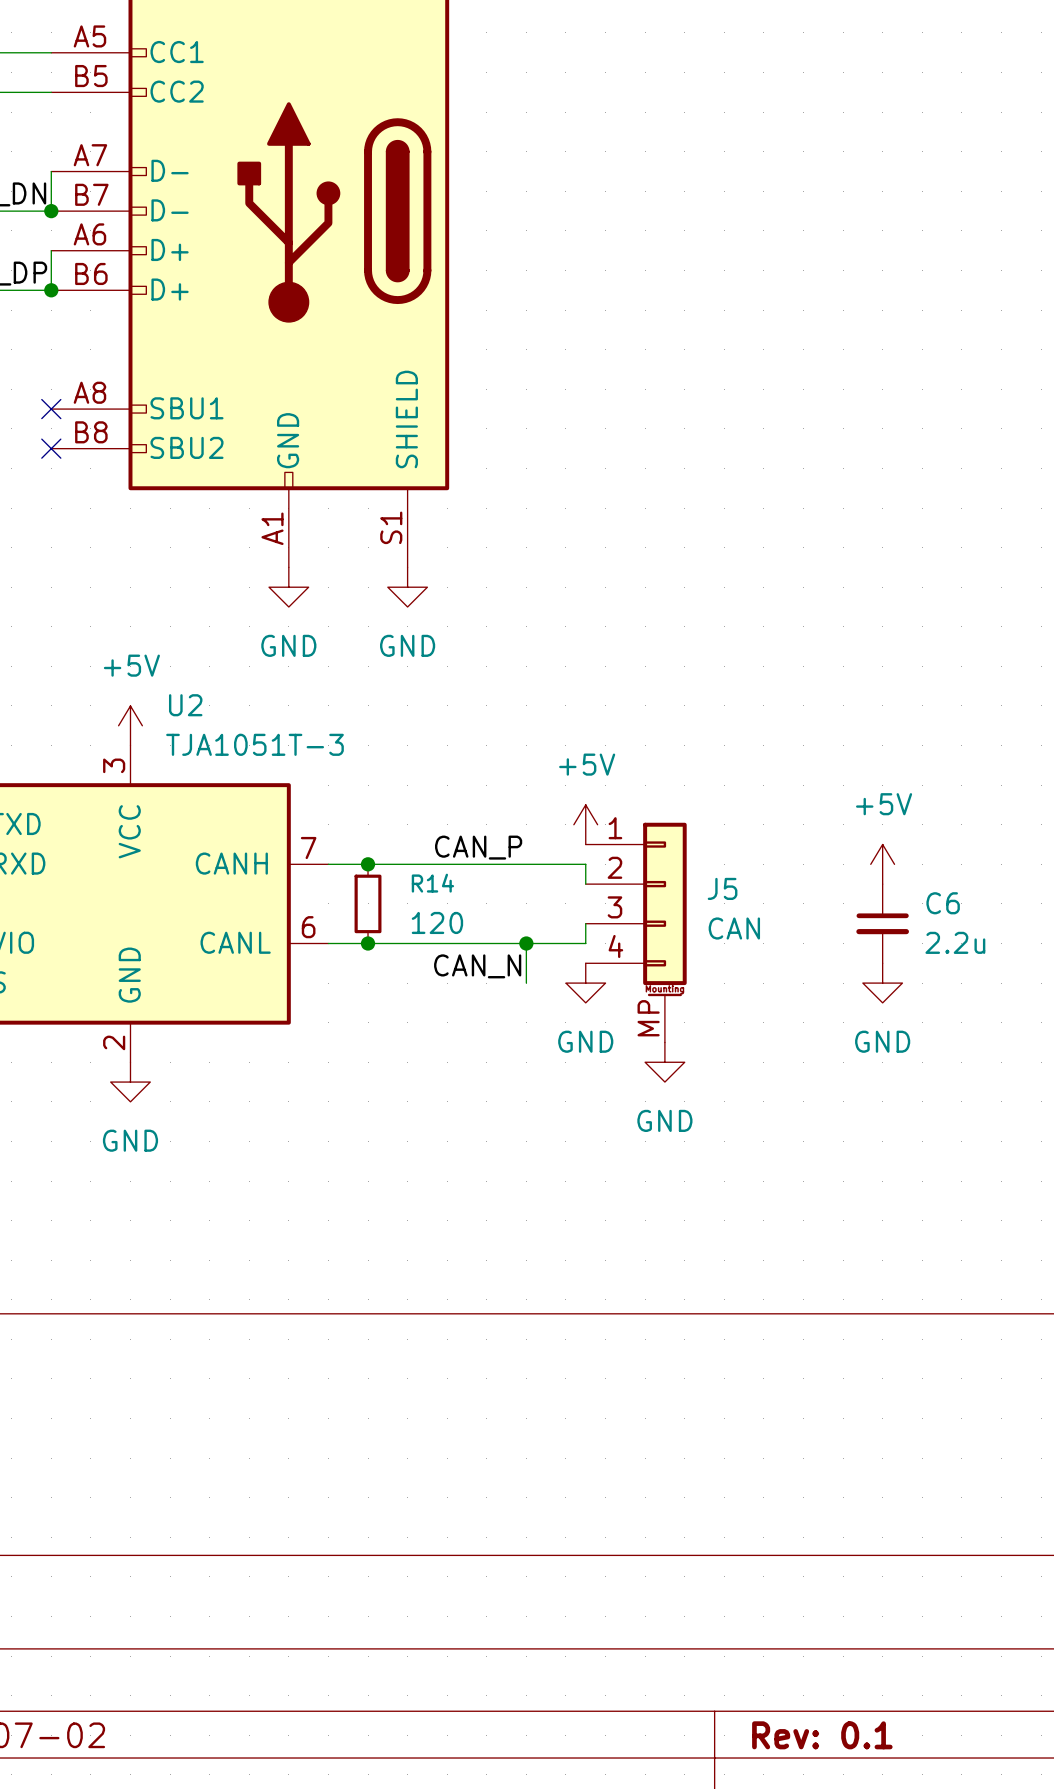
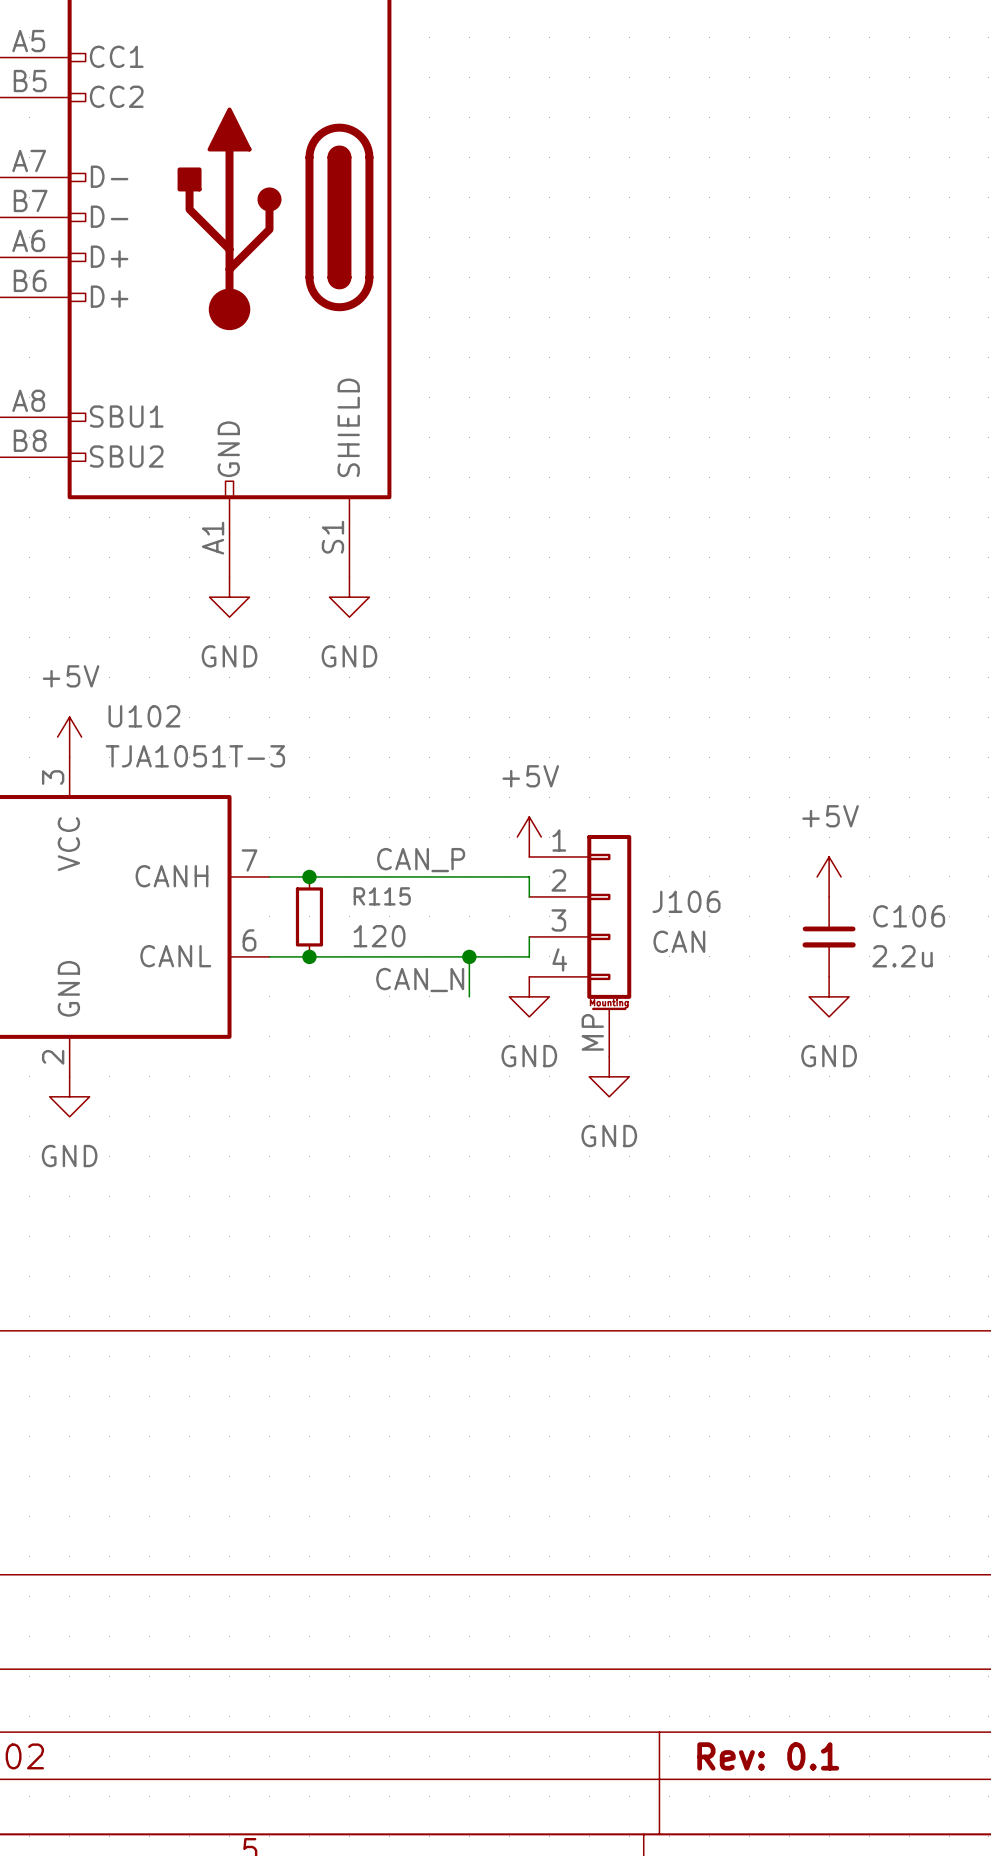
U2 name: U2 (185, 705) -> U102 (144, 716)
R14 name: R14 (432, 883) -> R115 (382, 896)
J5 name: J5 (722, 888) -> J106 (686, 901)
C6 name: C6 (943, 903) -> C106 (909, 916)

